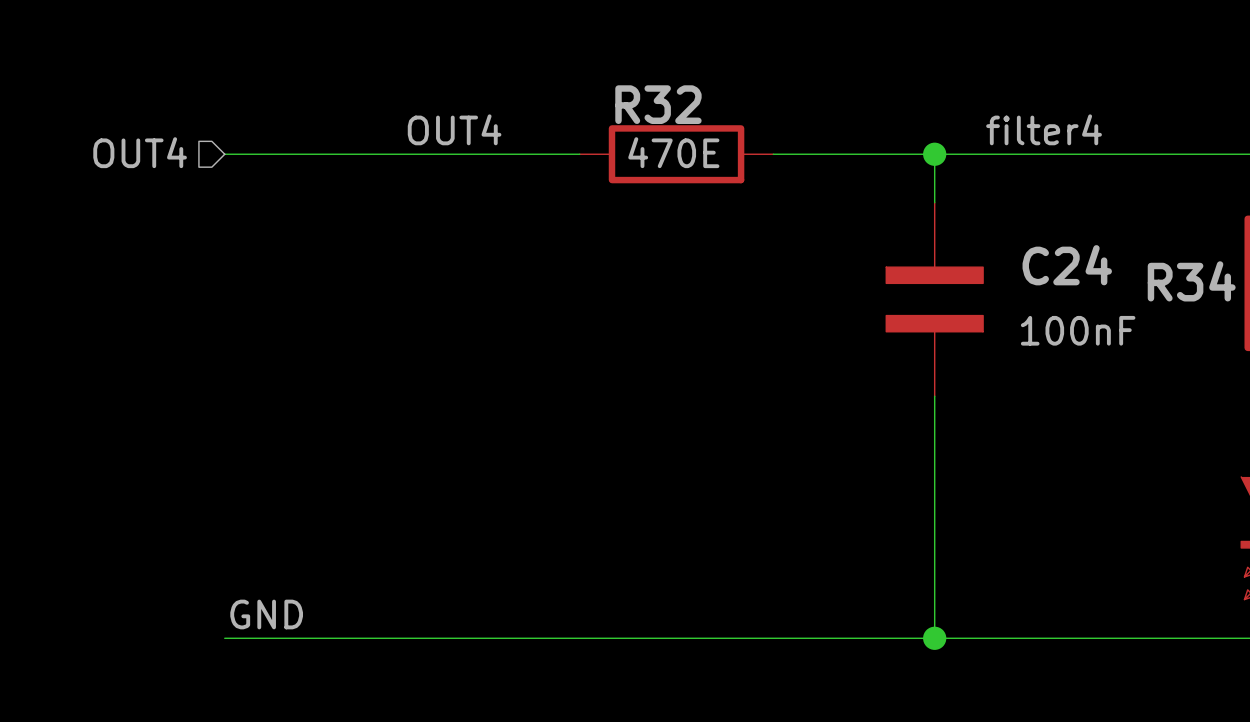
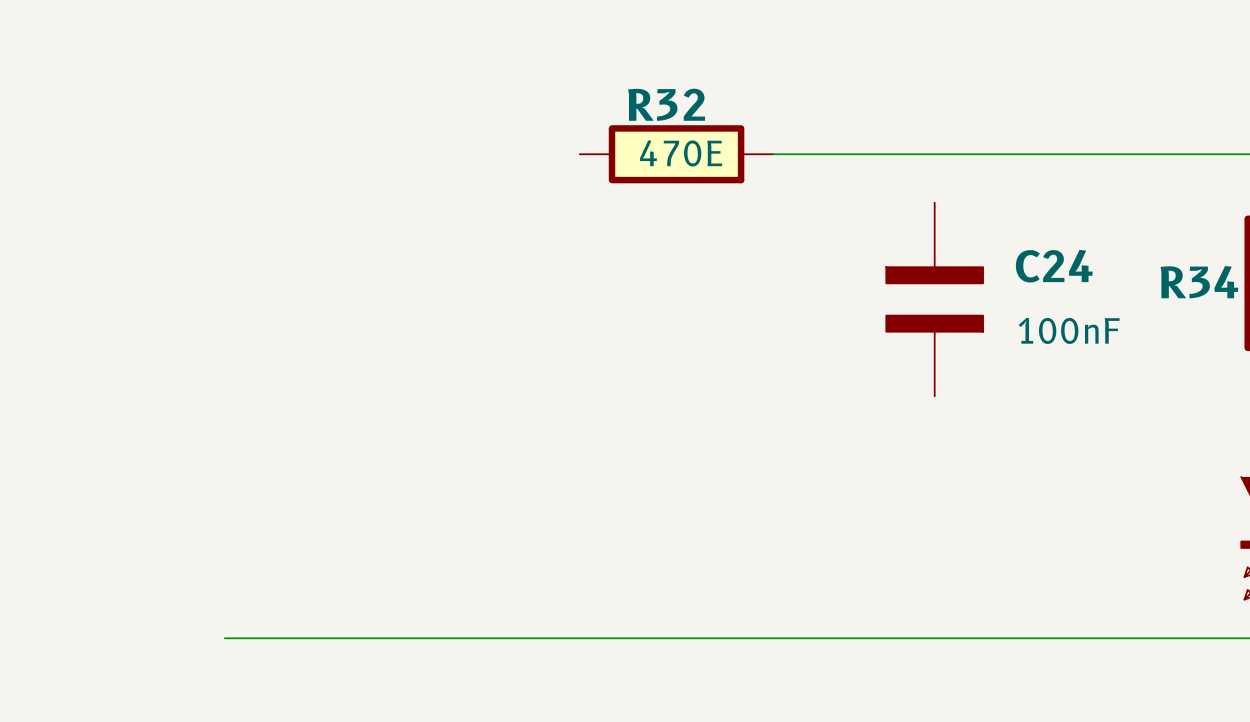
label: OUT4 (454, 129) -> none
label: filter4 (1044, 129) -> none
hierarchical label: OUT4 (140, 152) -> none
wire: (224, 154) (579, 154) -> none
wire: (934, 154) (934, 202) -> none
junction: (934, 154) -> none
wire: (934, 396) (934, 638) -> none
label: GND (266, 614) -> none
junction: (934, 638) -> none

